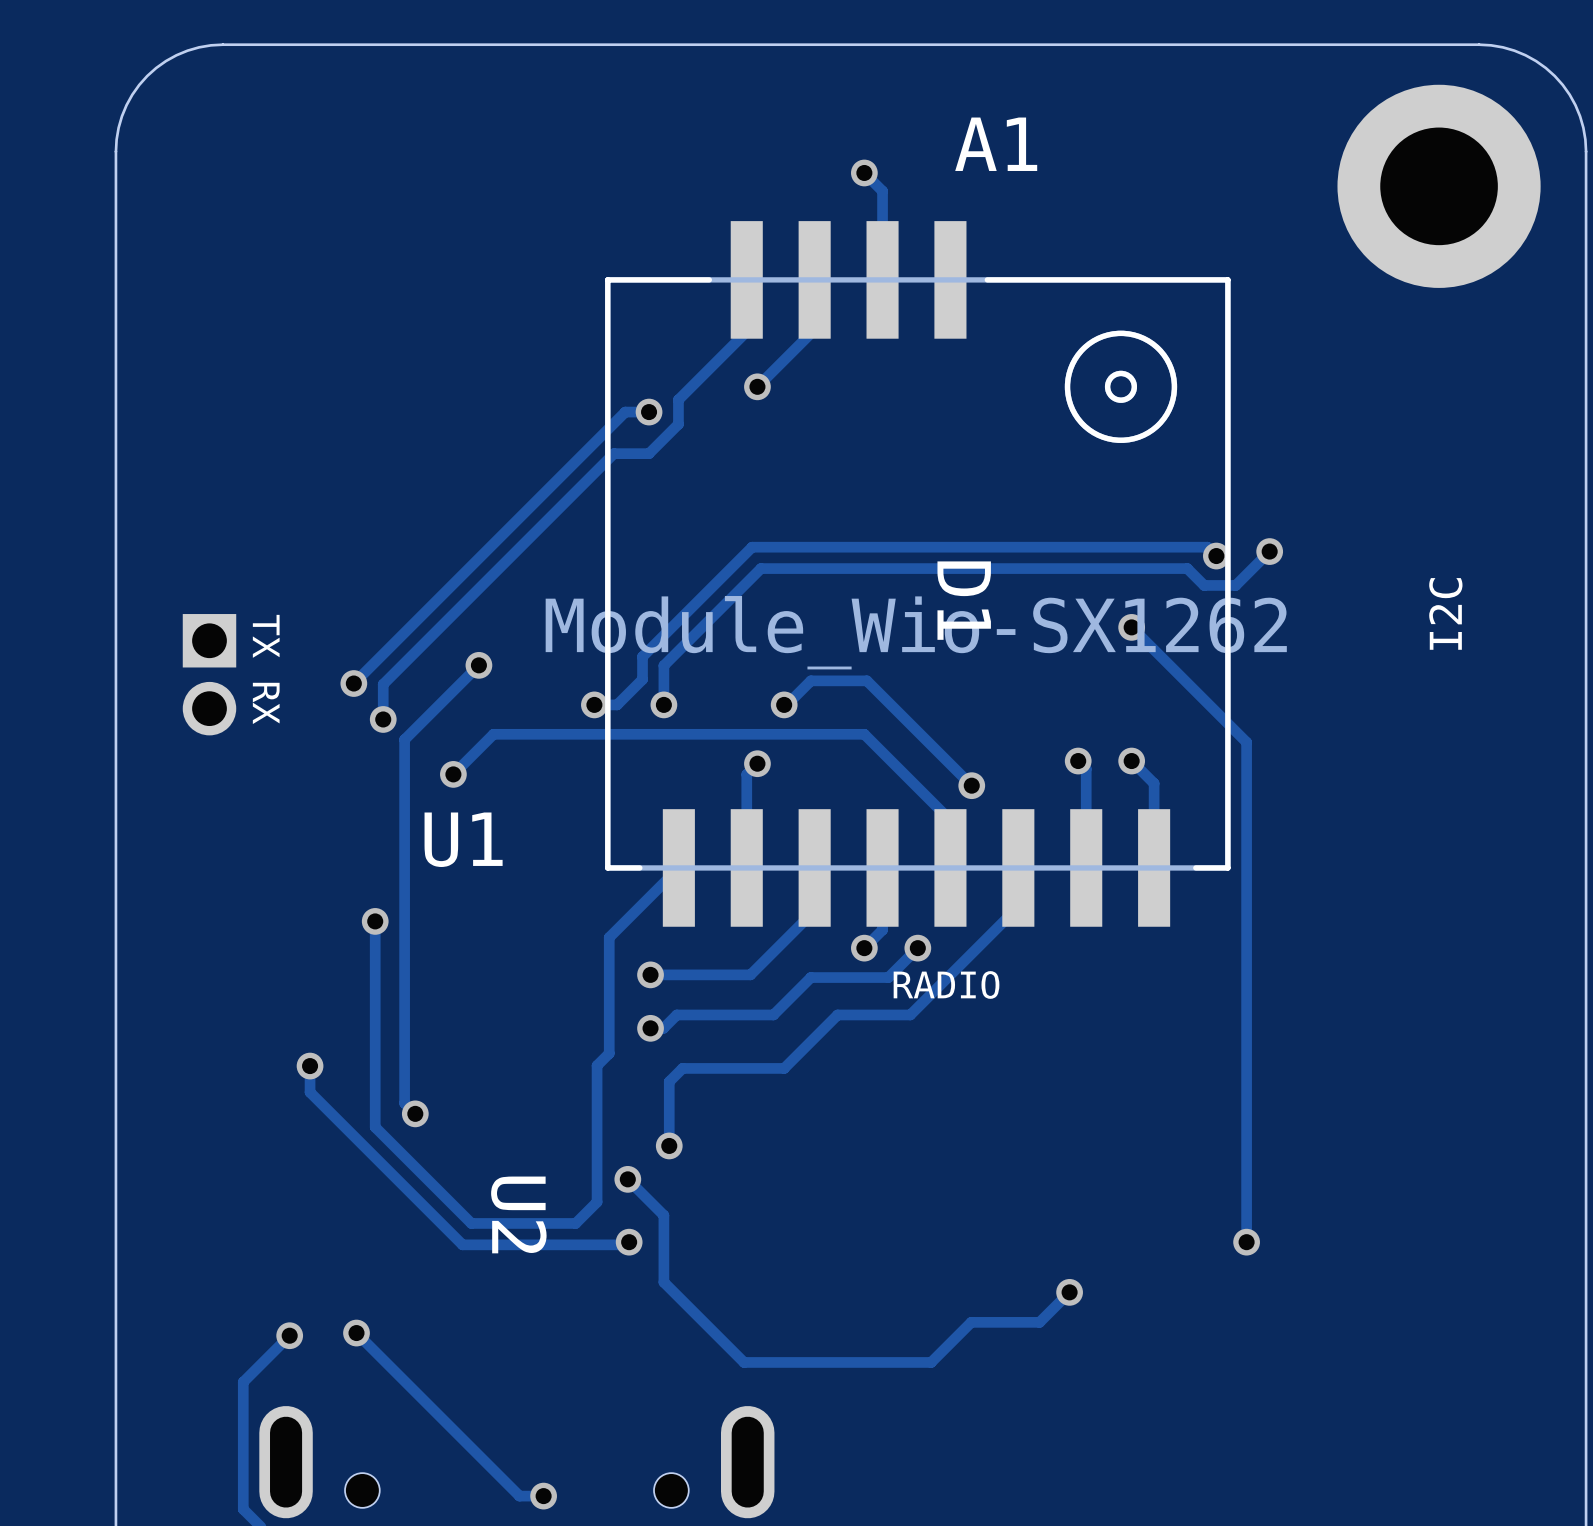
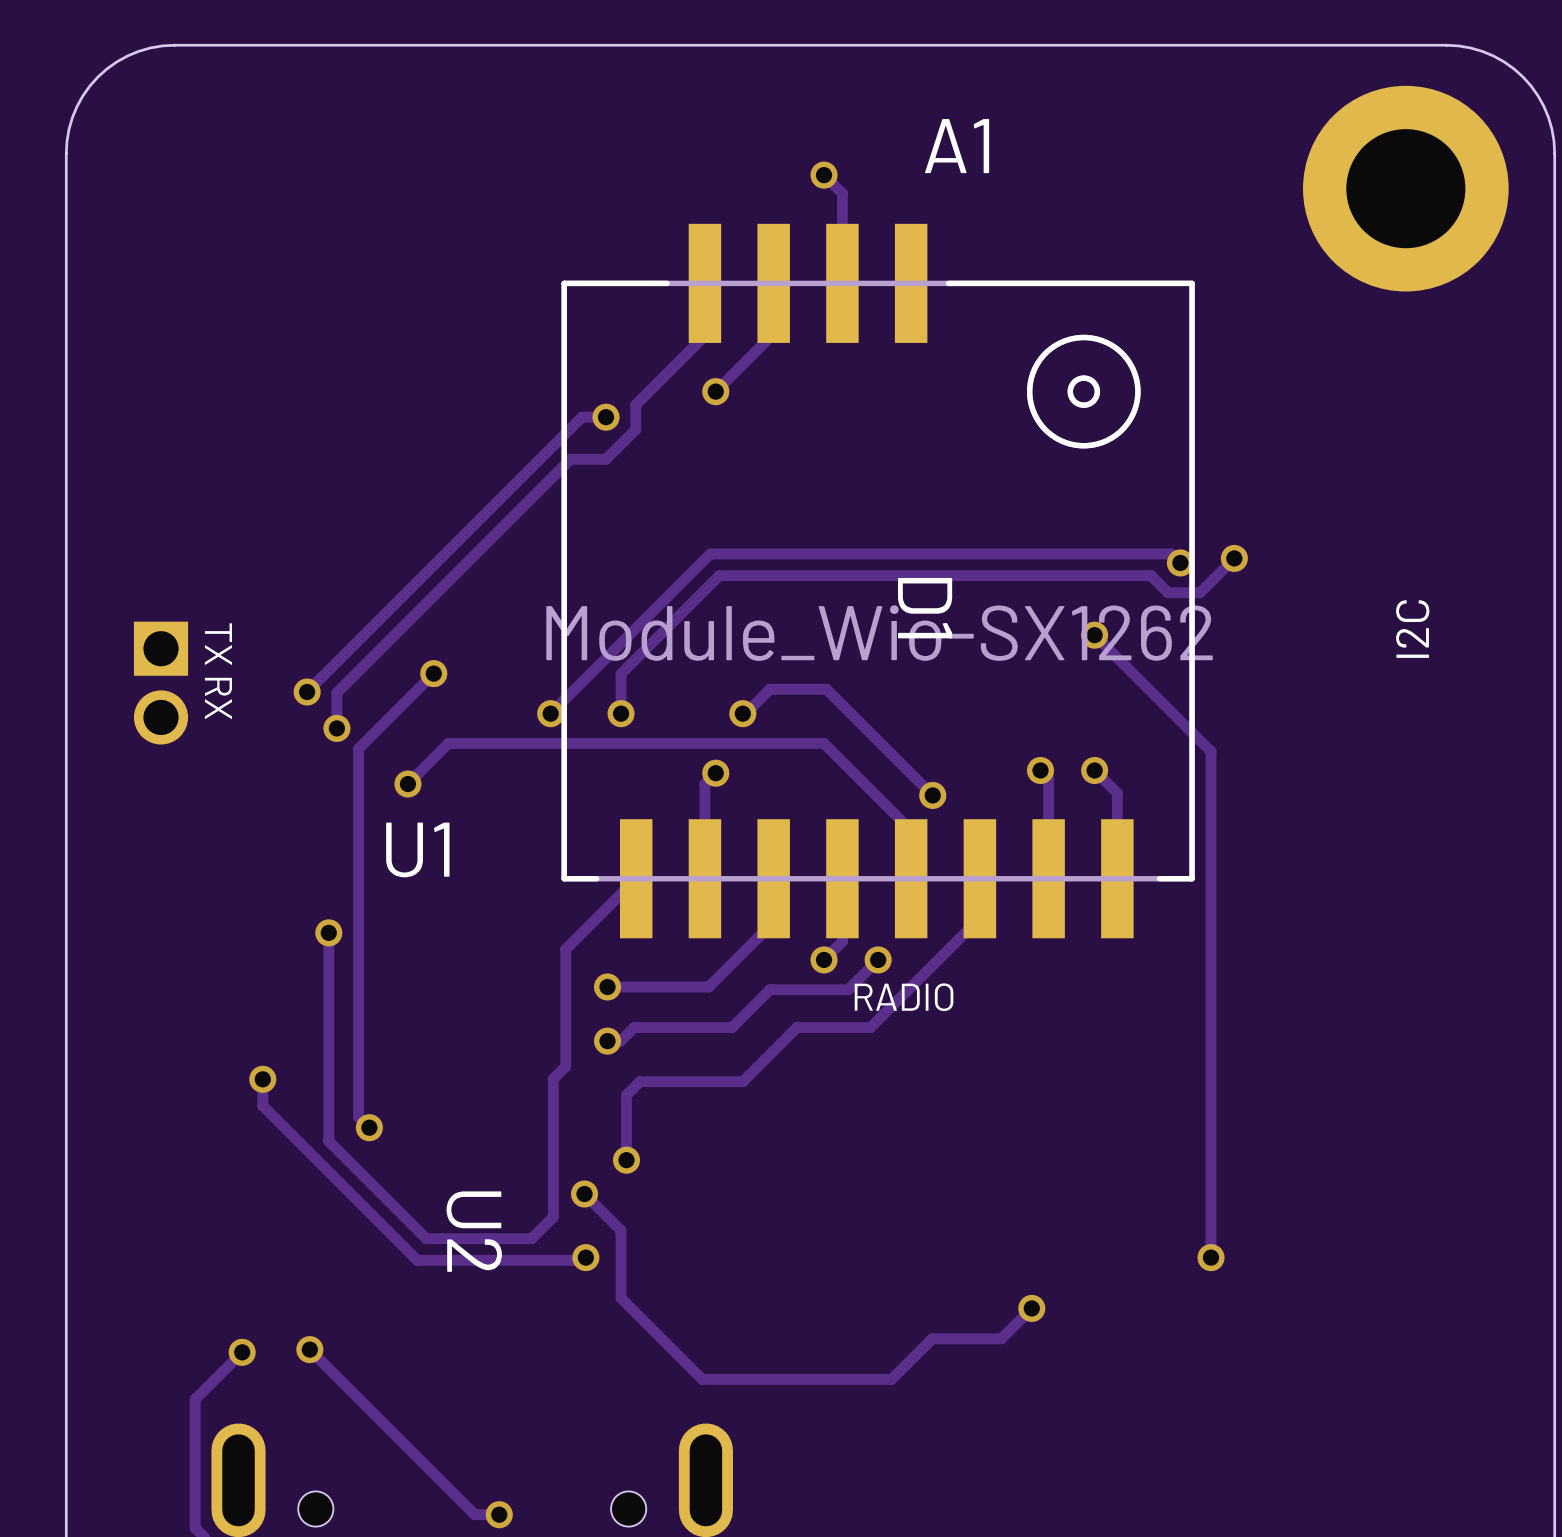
track: (642, 656) (642, 679) (617, 704) (594, 704) -> (599, 664) (550, 713)

